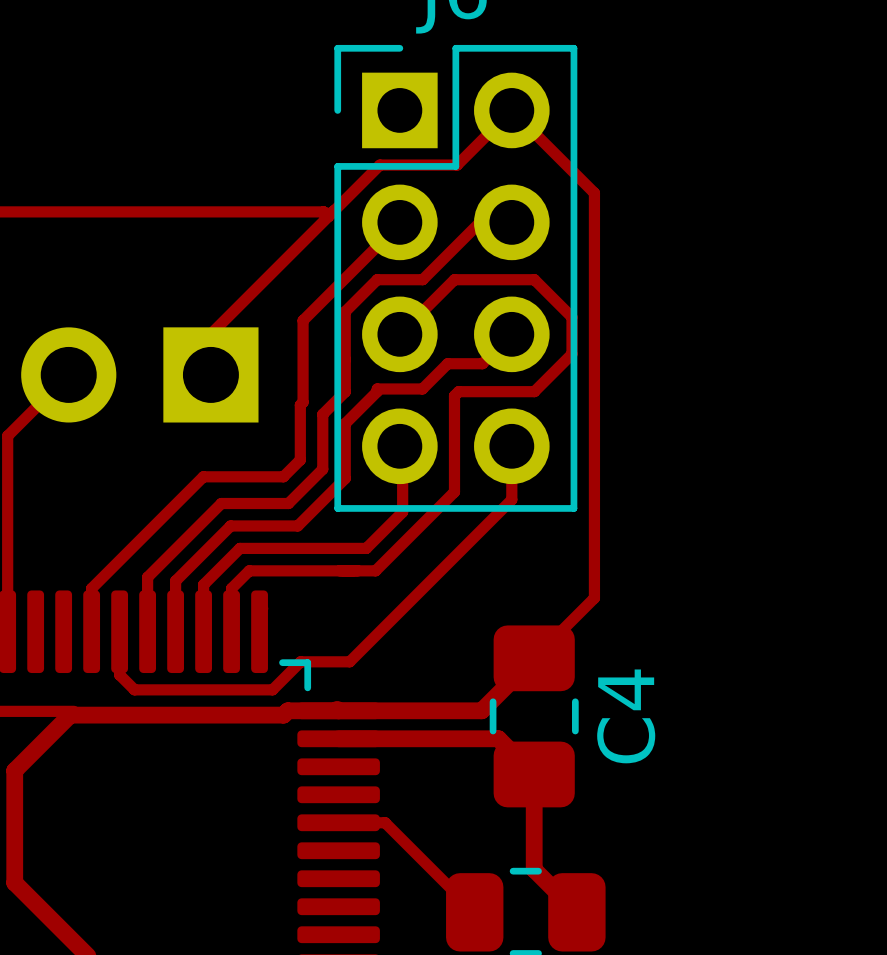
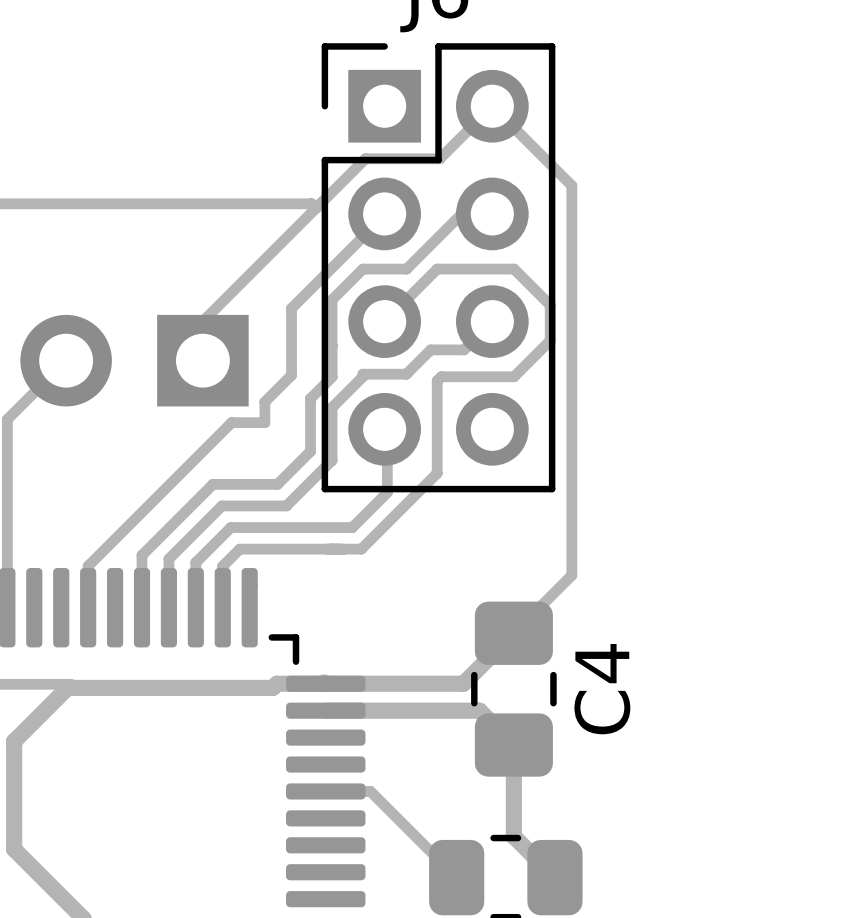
track: (303, 390) (303, 402) (300, 405) (300, 459) (283, 476) (203, 476) -> (291, 375) (264, 401) (264, 422) (231, 422) (195, 458)
track: (511, 446) (511, 499) (349, 661) (300, 661) (272, 689) (134, 689) (119, 674) (119, 631) -> none

